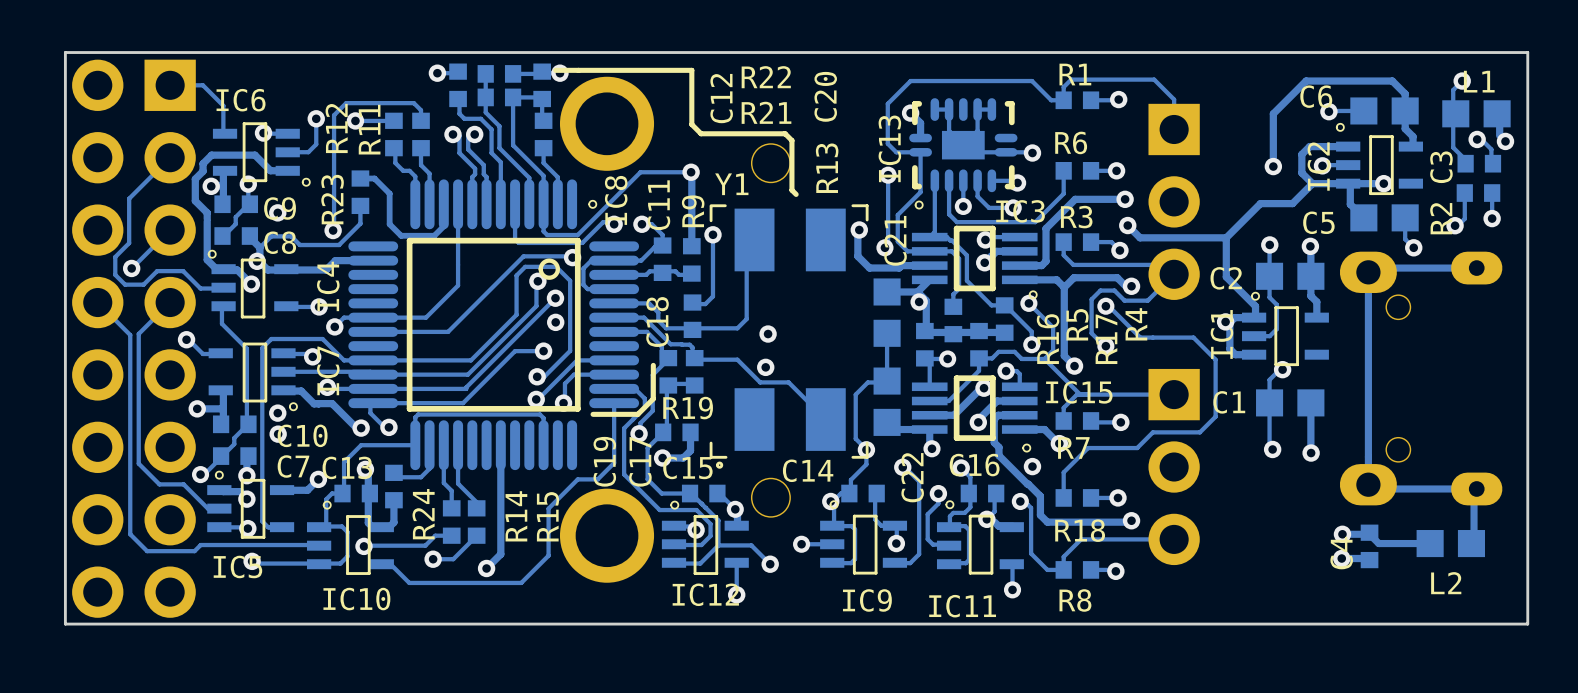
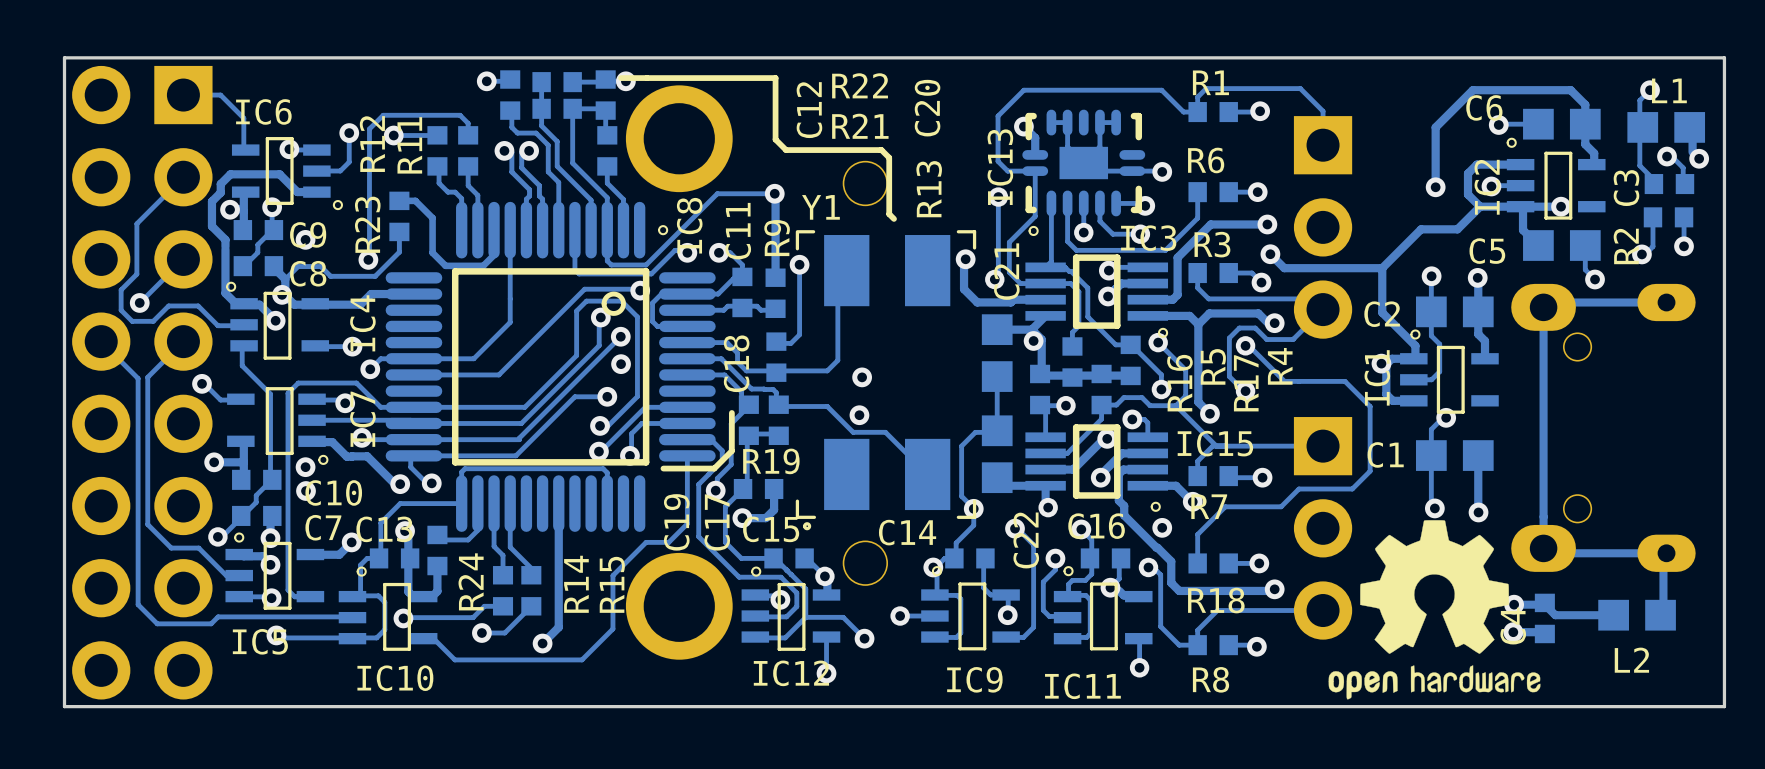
drawing: none -> [1328, 520, 1541, 700]

